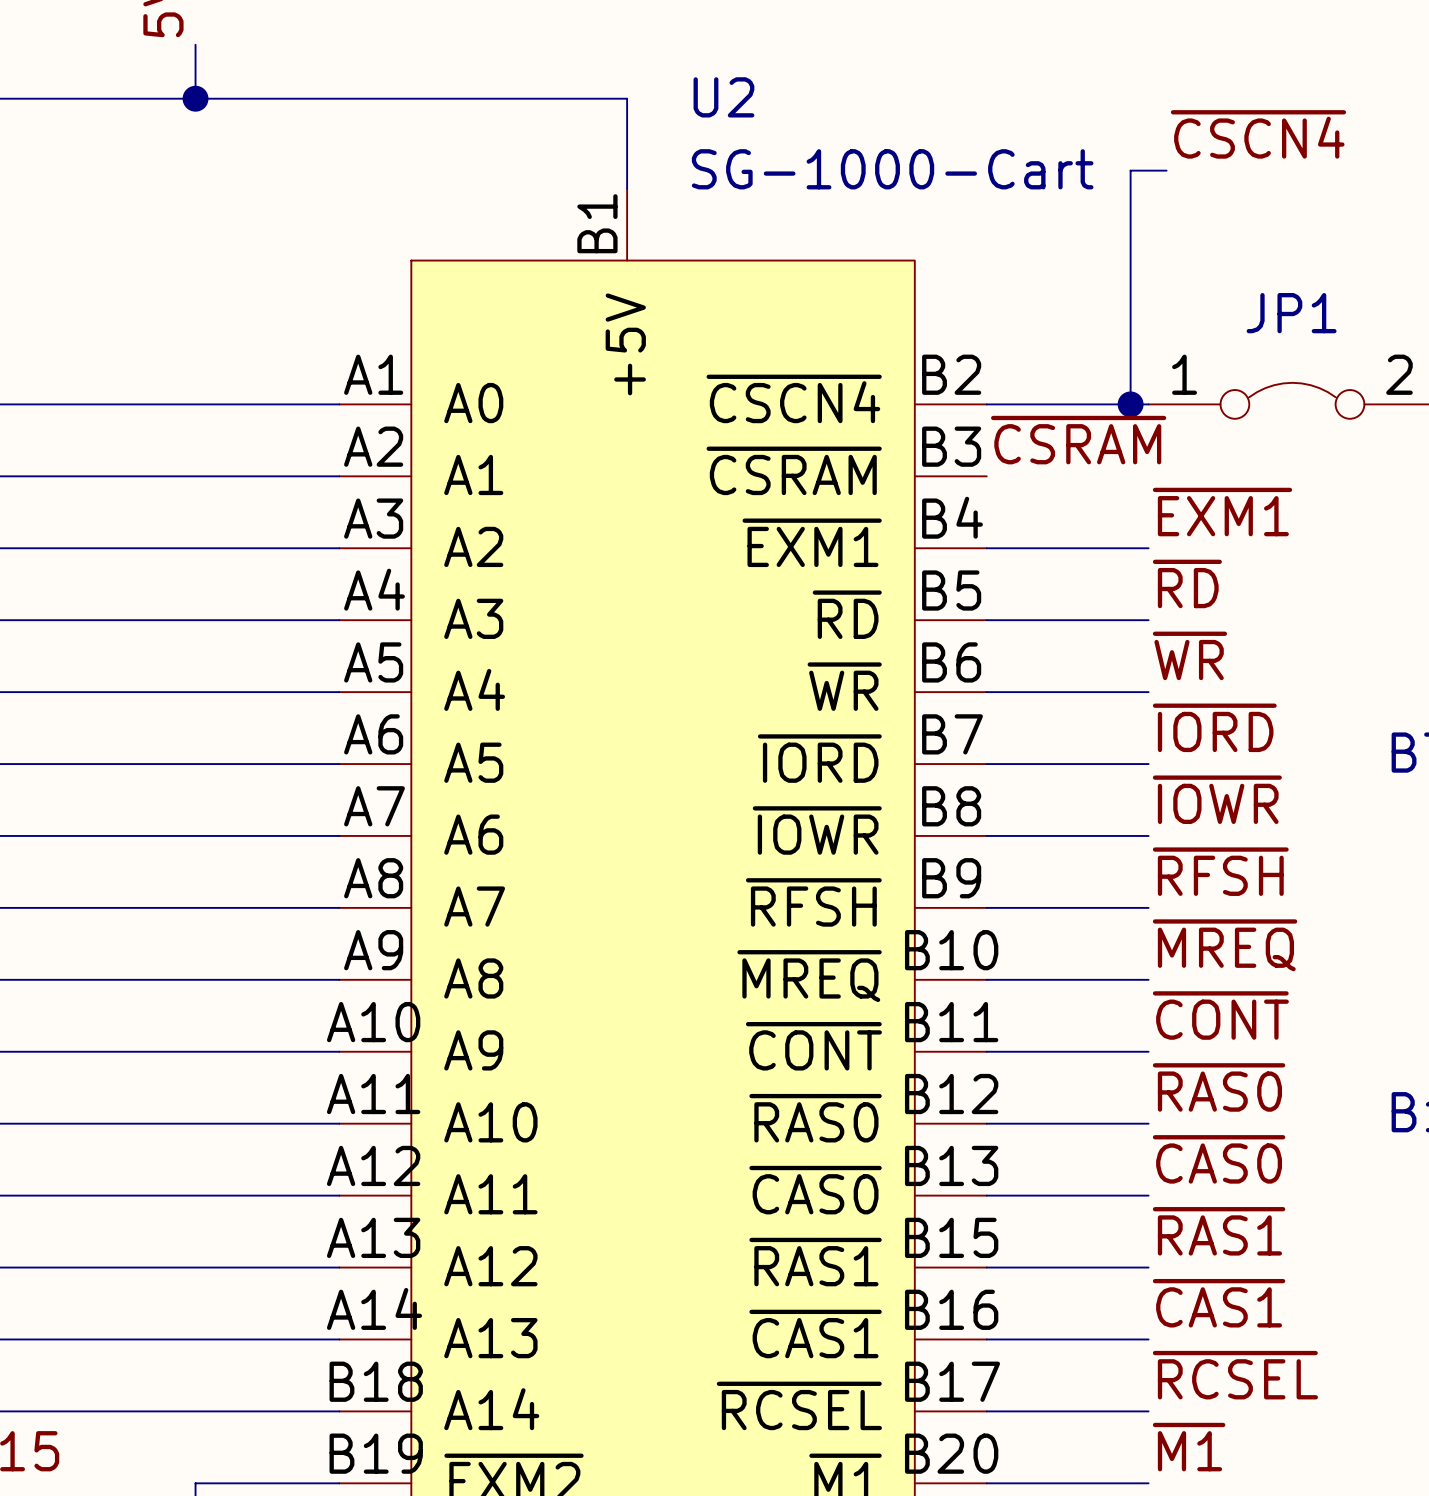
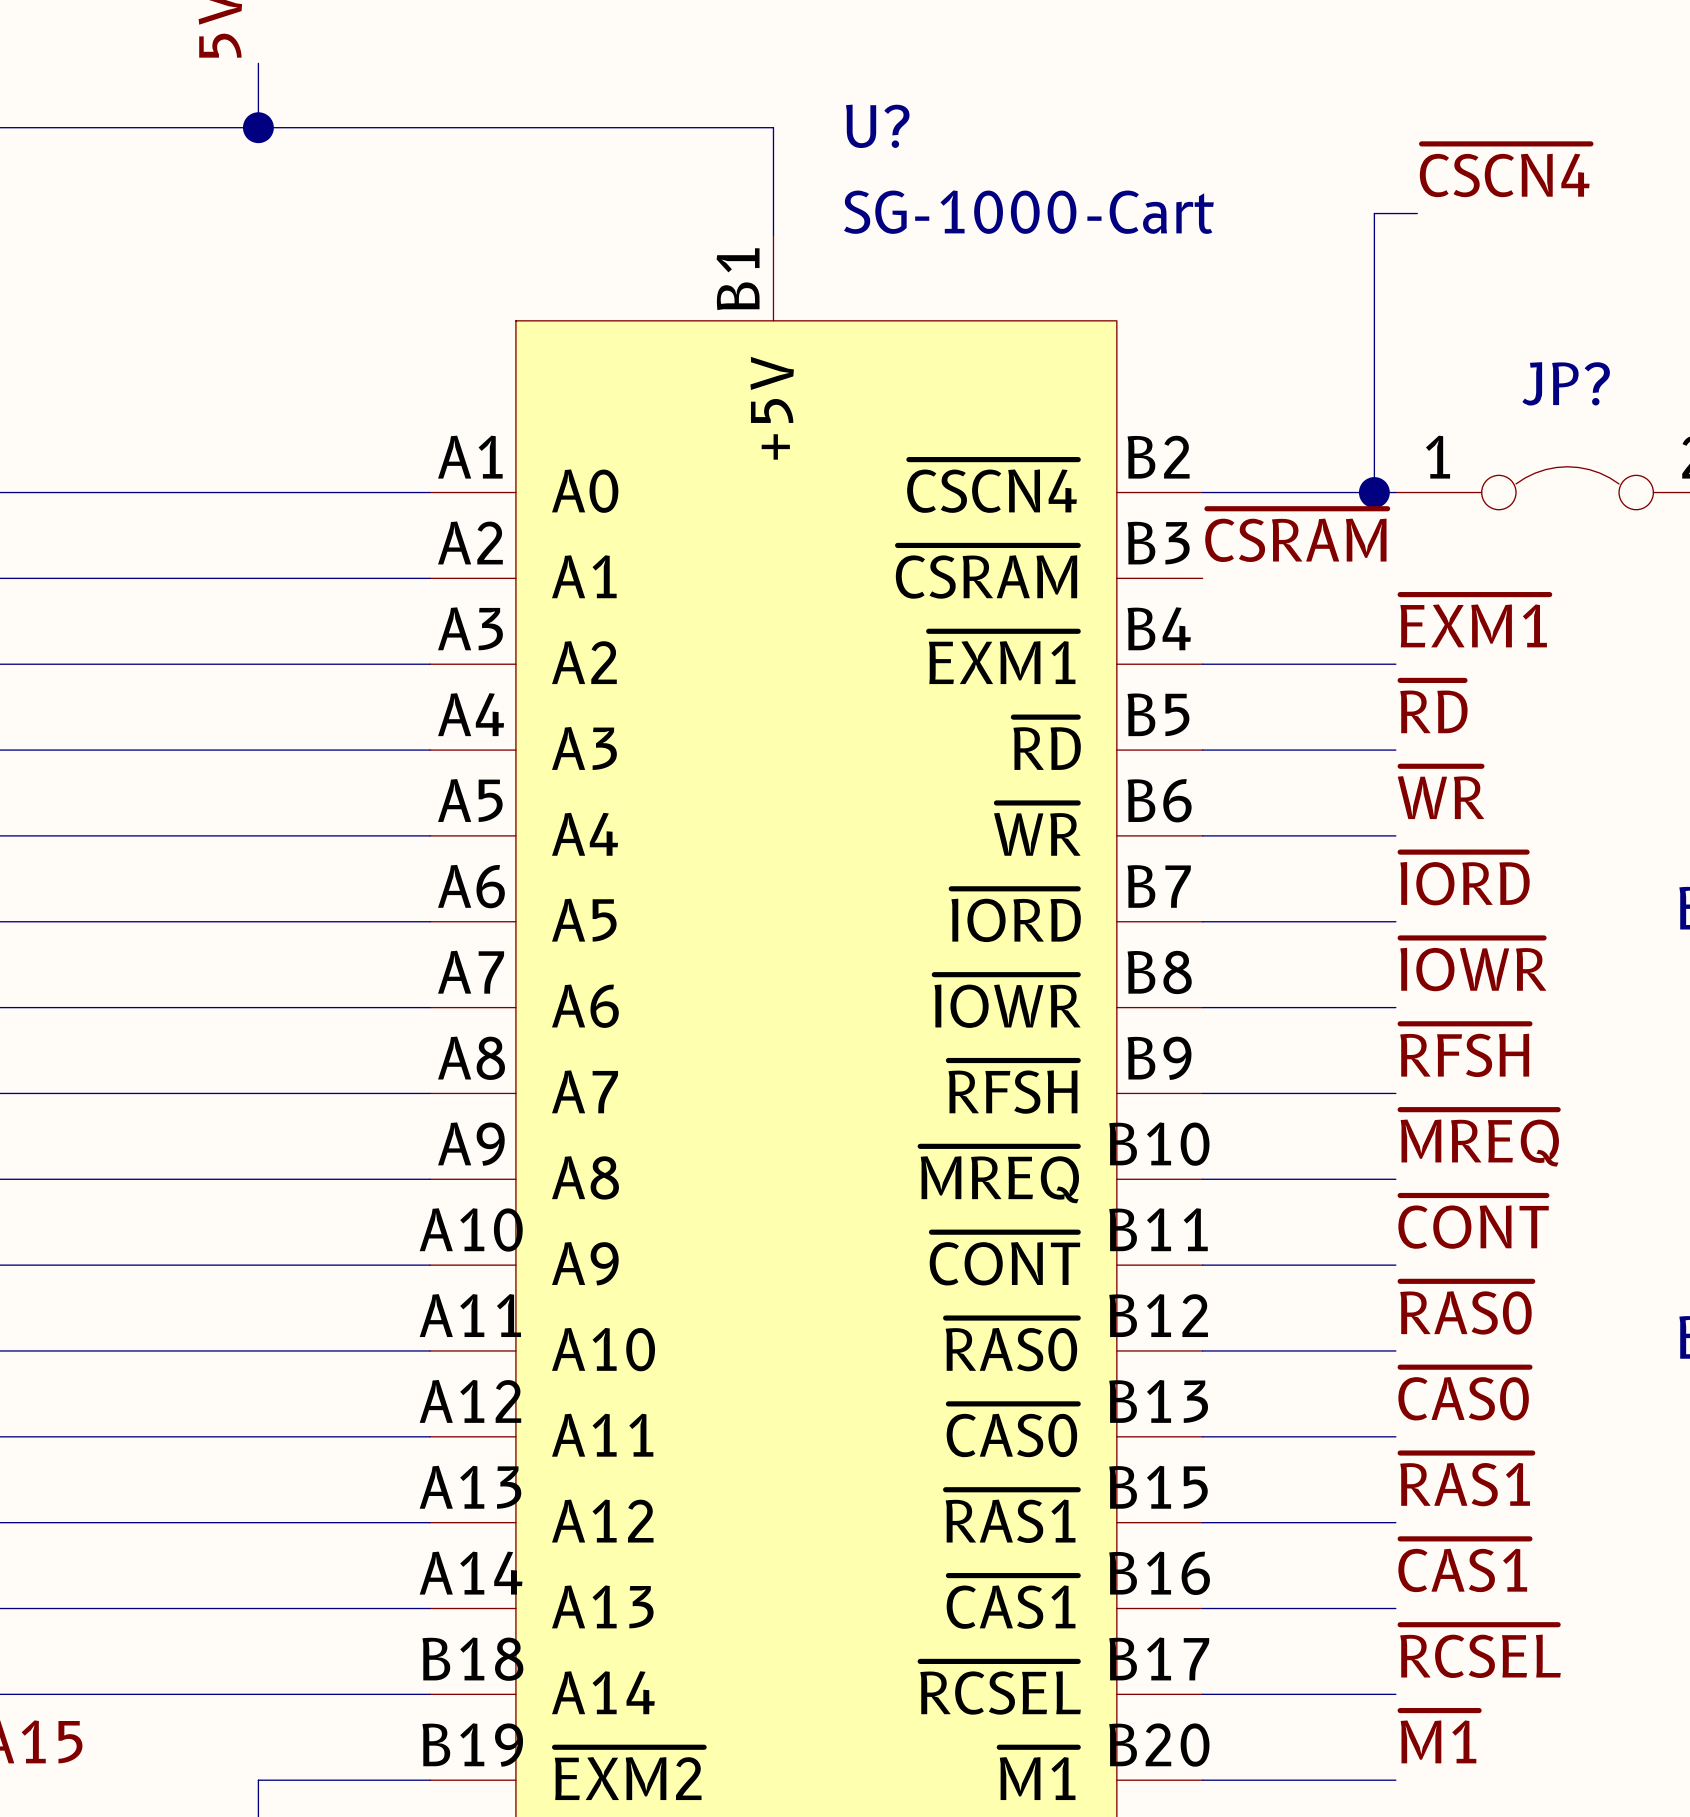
U2 name: U2 (723, 97) -> U? (877, 126)
JP1 name: JP1 (1291, 313) -> JP? (1566, 383)

